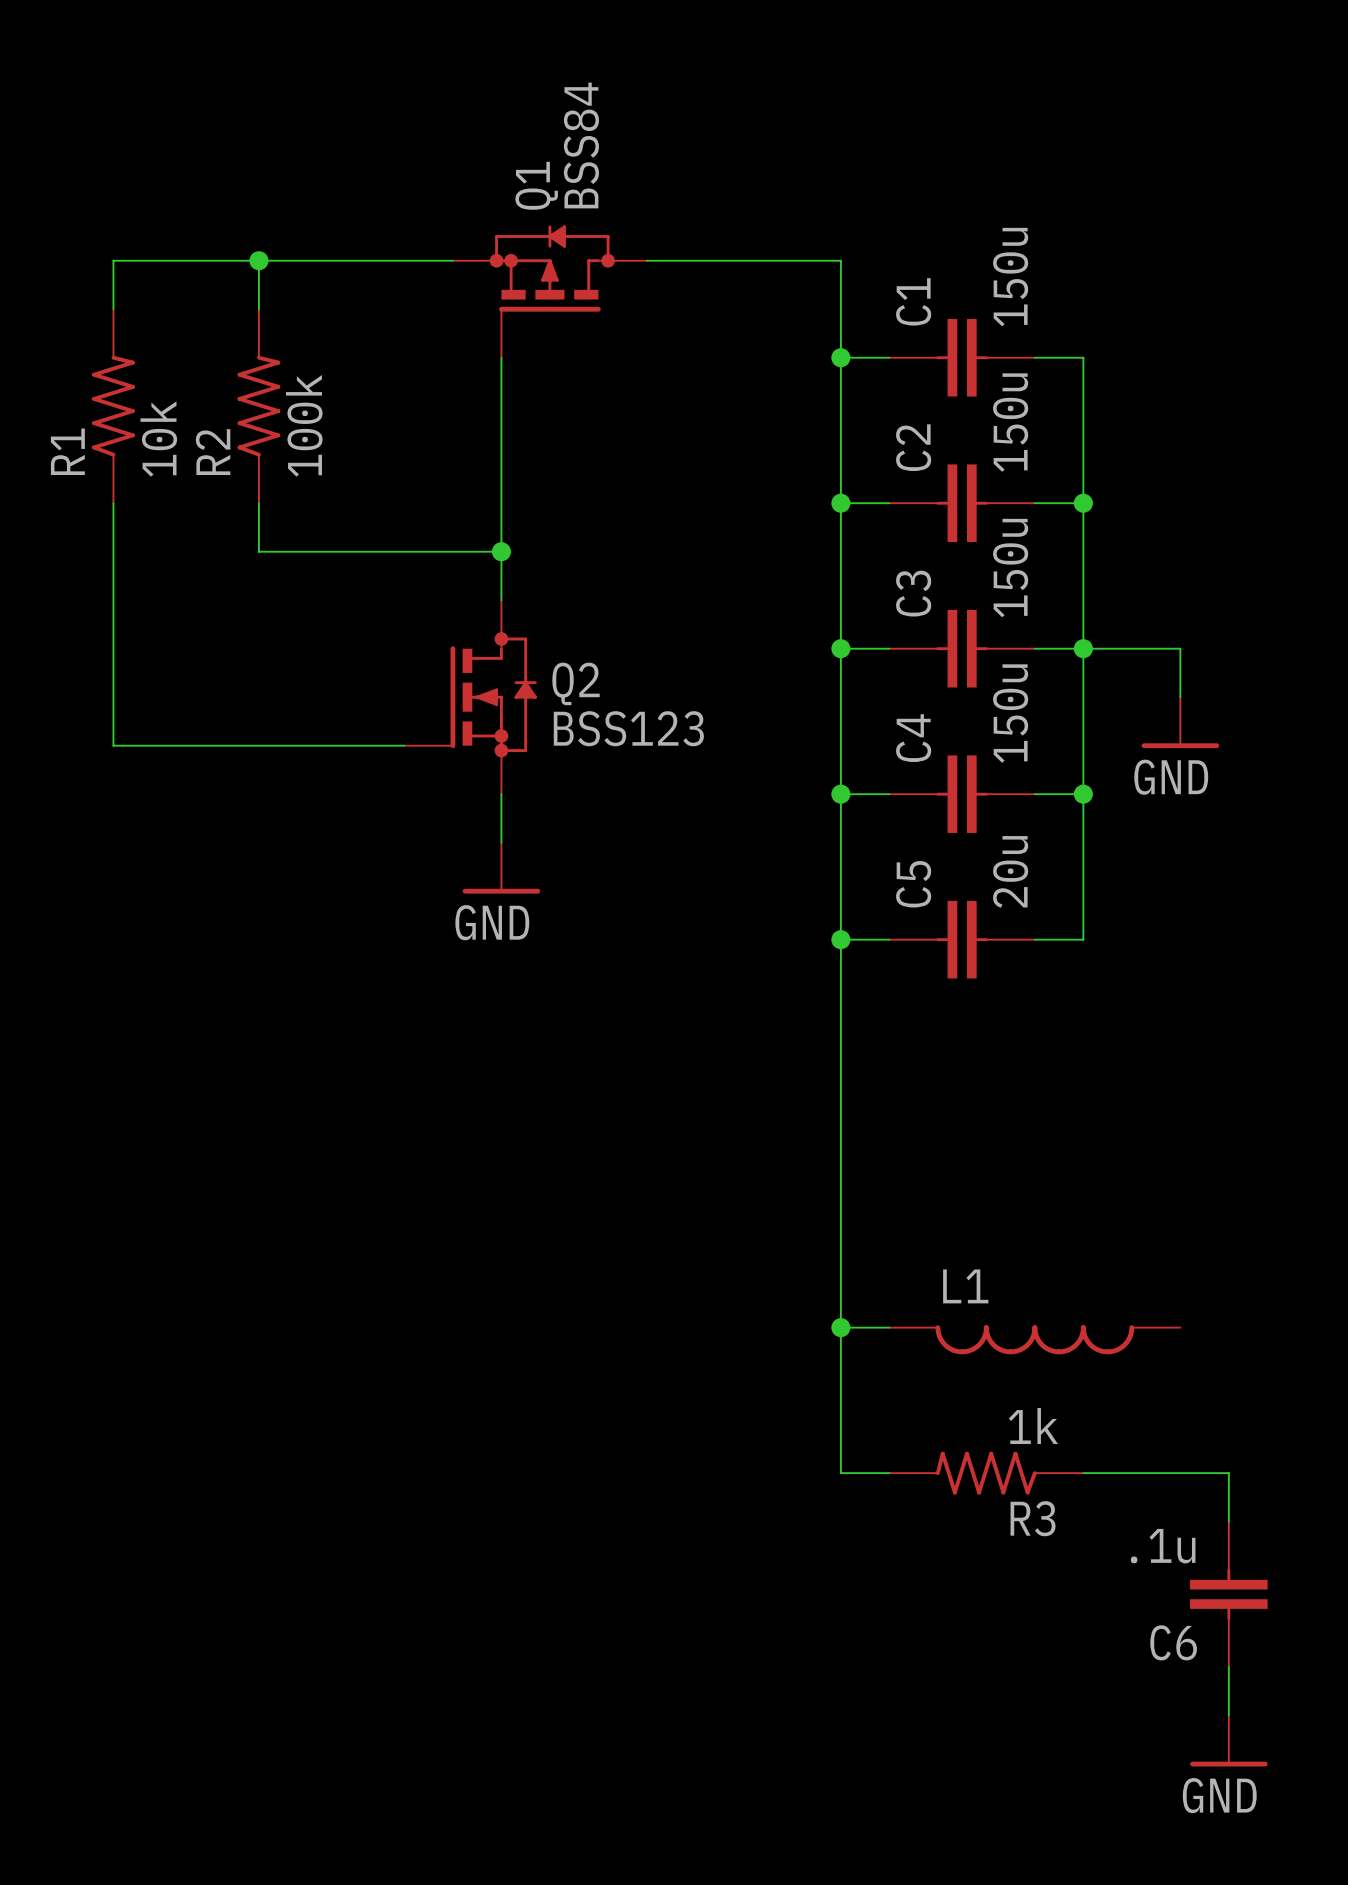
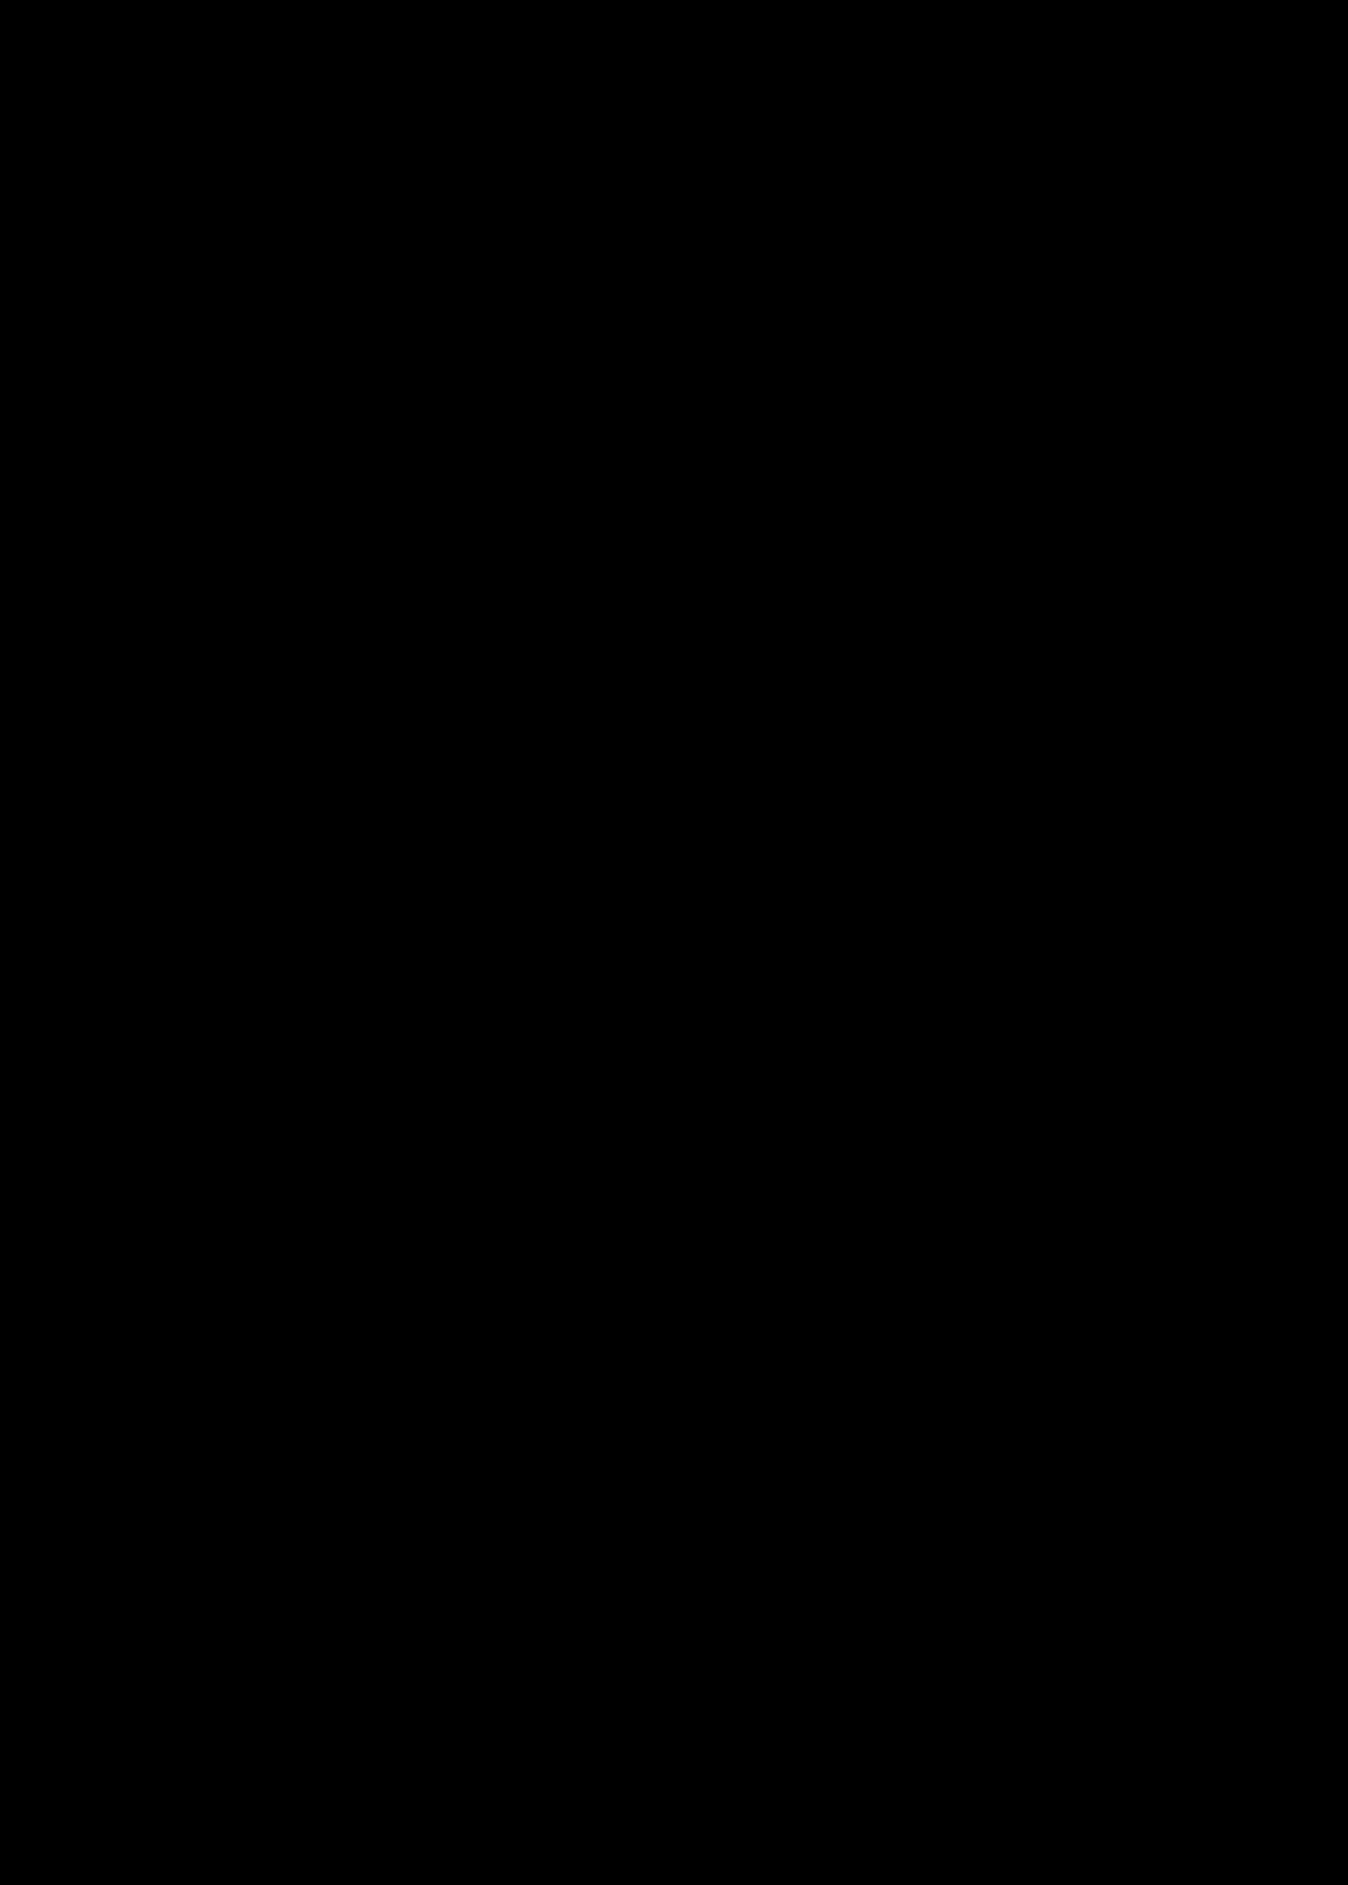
wire: (258, 260) (258, 309) -> none
junction: (258, 260) -> none
wire: (452, 260) (113, 260) (113, 309) -> none
wire: (646, 260) (840, 260) (840, 1473) (889, 1473) -> none
Q1: BSS84 (549, 291) -> none
wire: (501, 357) (501, 600) -> none
wire: (840, 357) (889, 357) -> none
junction: (840, 357) -> none
C1: 150u (962, 357) -> none
wire: (1034, 357) (1083, 357) (1083, 939) (1034, 939) -> none
R1: 10k (113, 406) -> none
R2: 100k (258, 406) -> none
wire: (113, 503) (113, 745) (404, 745) -> none
wire: (258, 503) (258, 551) (501, 551) -> none
wire: (840, 503) (889, 503) -> none
junction: (840, 503) -> none
C2: 150u (962, 503) -> none
wire: (1034, 503) (1083, 503) -> none
junction: (1083, 503) -> none
junction: (501, 551) -> none
wire: (840, 648) (889, 648) -> none
junction: (840, 648) -> none
C3: 150u (962, 648) -> none
wire: (1034, 648) (1180, 648) (1180, 697) -> none
junction: (1083, 648) -> none
Q2: BSS123 (470, 697) -> none
power symbol: GND (1180, 722) -> none
wire: (501, 794) (501, 842) -> none
wire: (840, 794) (889, 794) -> none
junction: (840, 794) -> none
C4: 150u (962, 794) -> none
wire: (1034, 794) (1083, 794) -> none
junction: (1083, 794) -> none
power symbol: GND (501, 868) -> none
wire: (840, 939) (889, 939) -> none
junction: (840, 939) -> none
C5: 20u (962, 939) -> none
wire: (840, 1327) (889, 1327) -> none
junction: (840, 1327) -> none
L1: (1034, 1339) -> none
R3: 1k (986, 1473) -> none
wire: (1083, 1473) (1228, 1473) (1228, 1521) -> none
C6: .1u (1228, 1594) -> none
wire: (1228, 1667) (1228, 1715) -> none
power symbol: GND (1228, 1741) -> none

